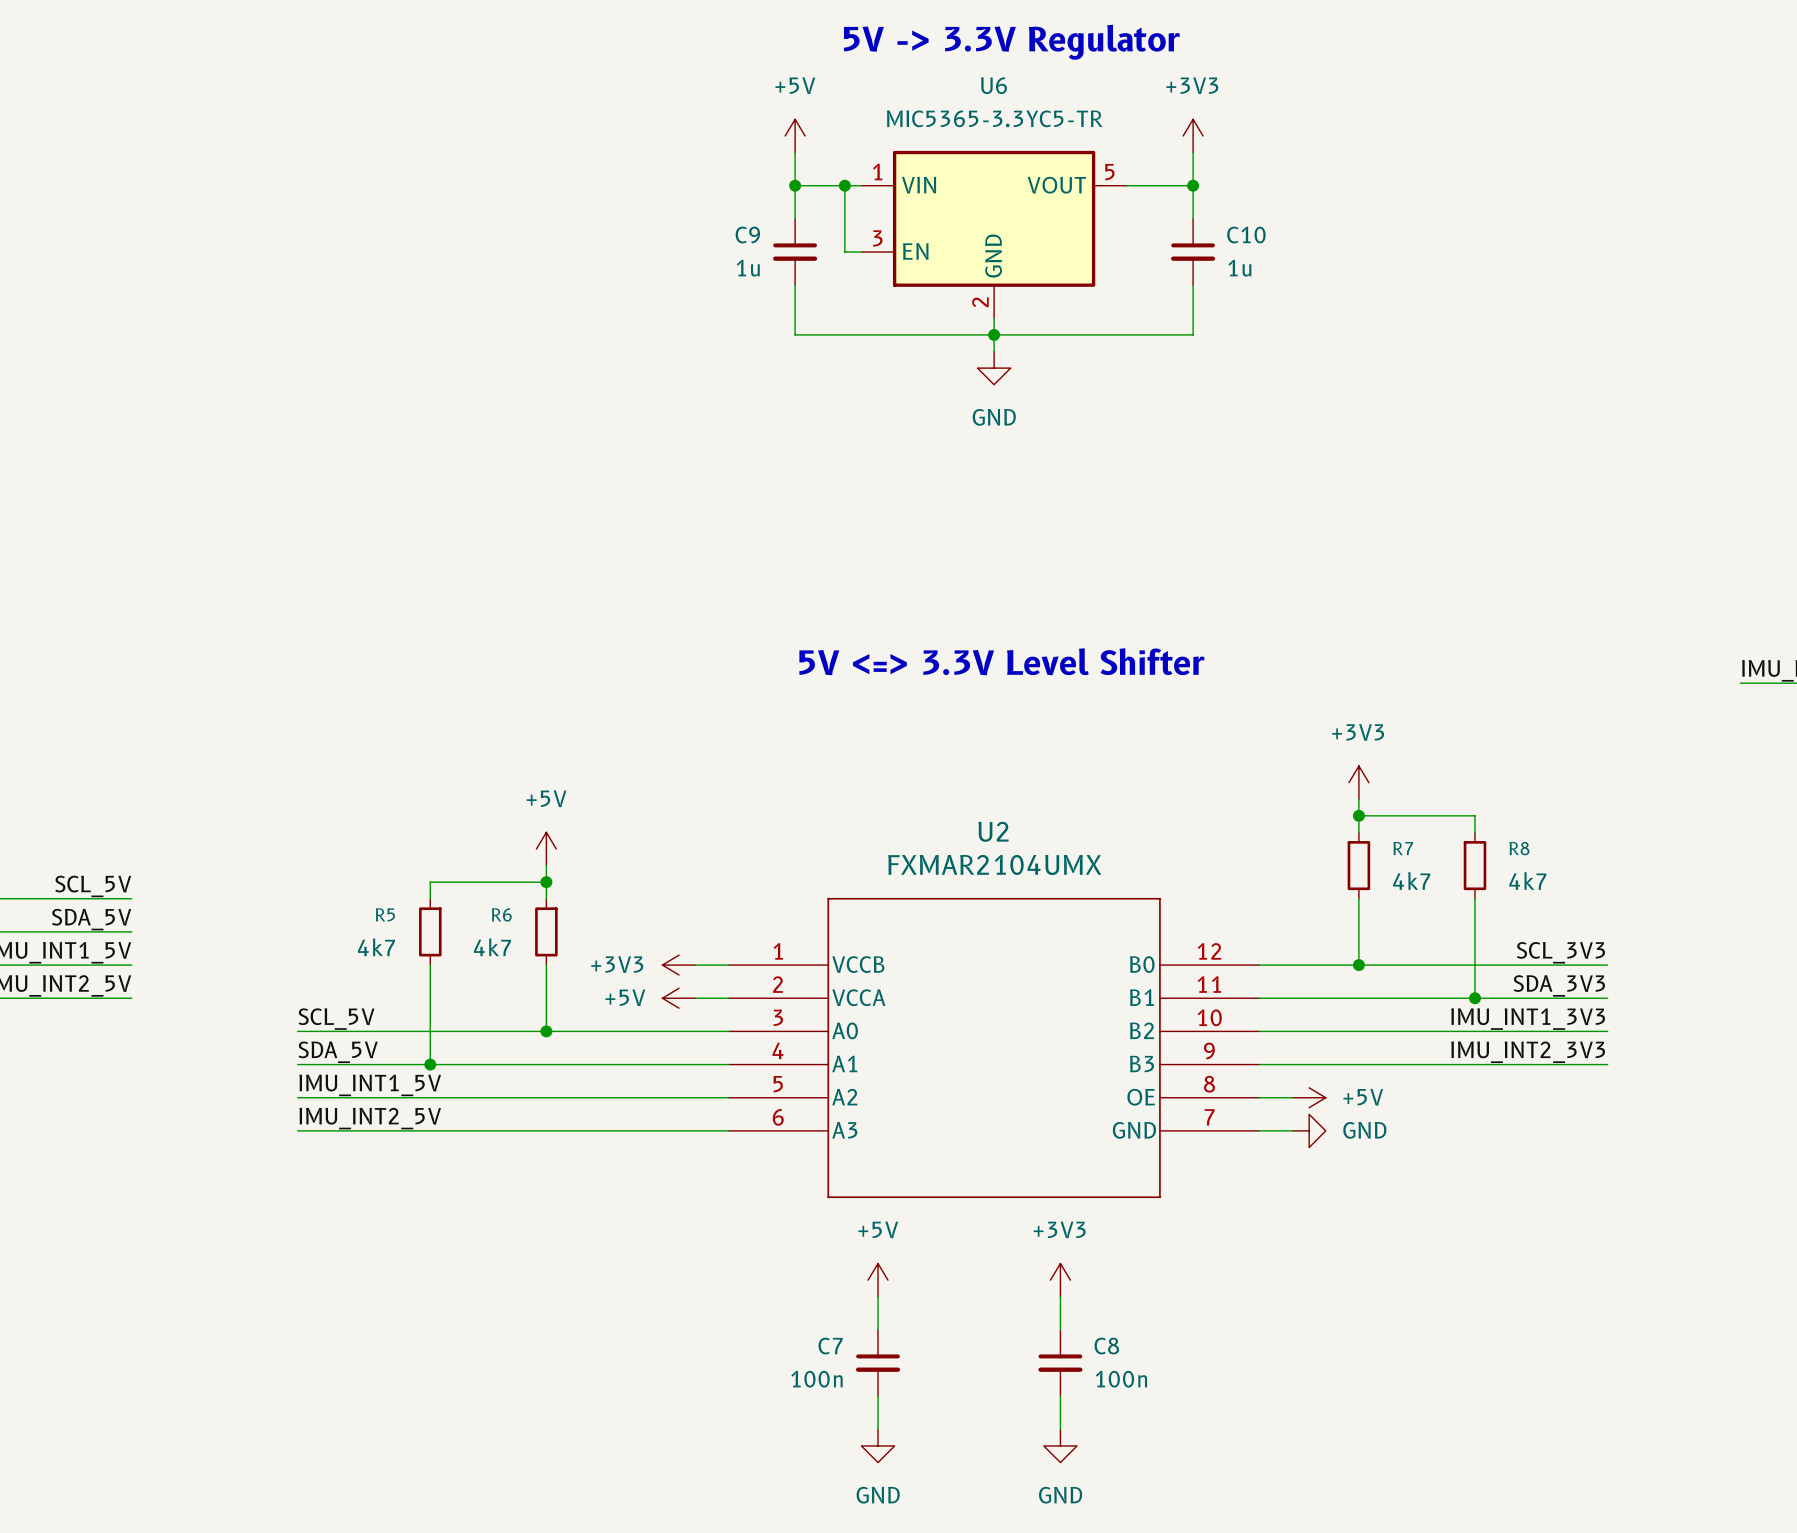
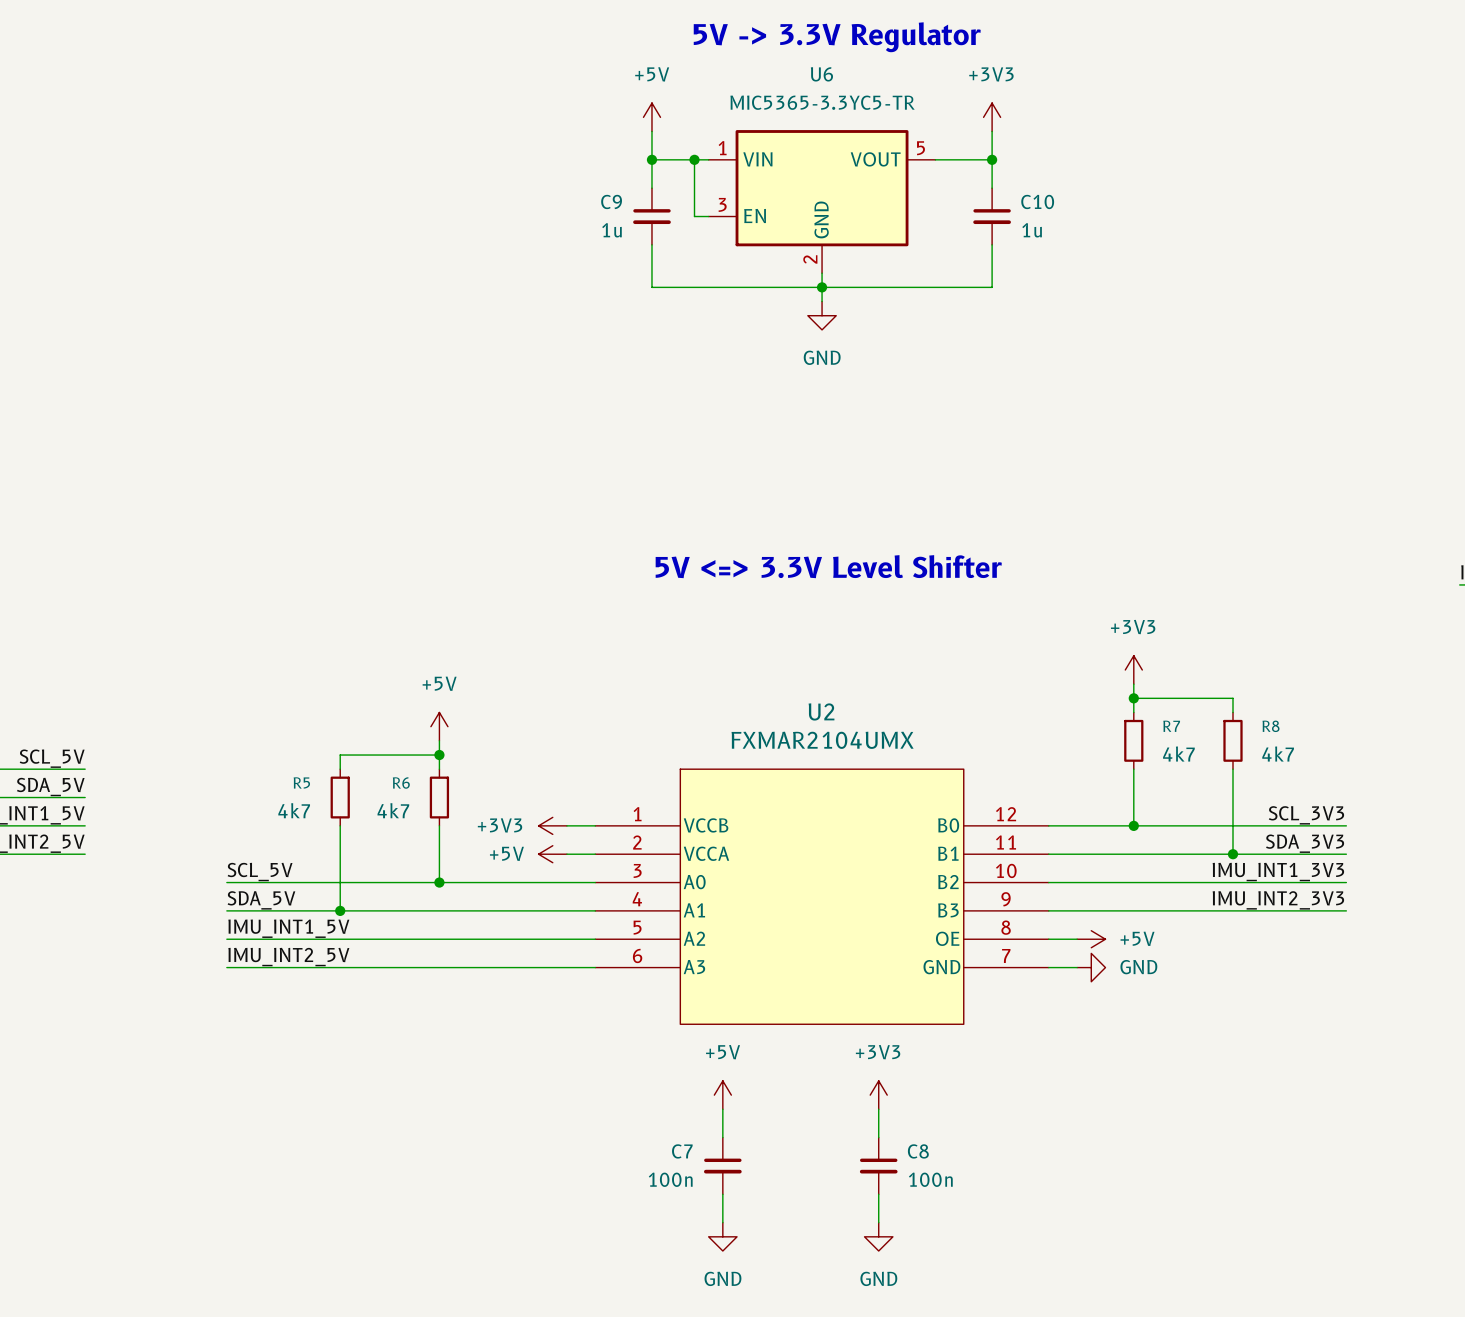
U2 symbol: [728, 897, 1260, 1199] -> [595, 769, 1049, 1025]

